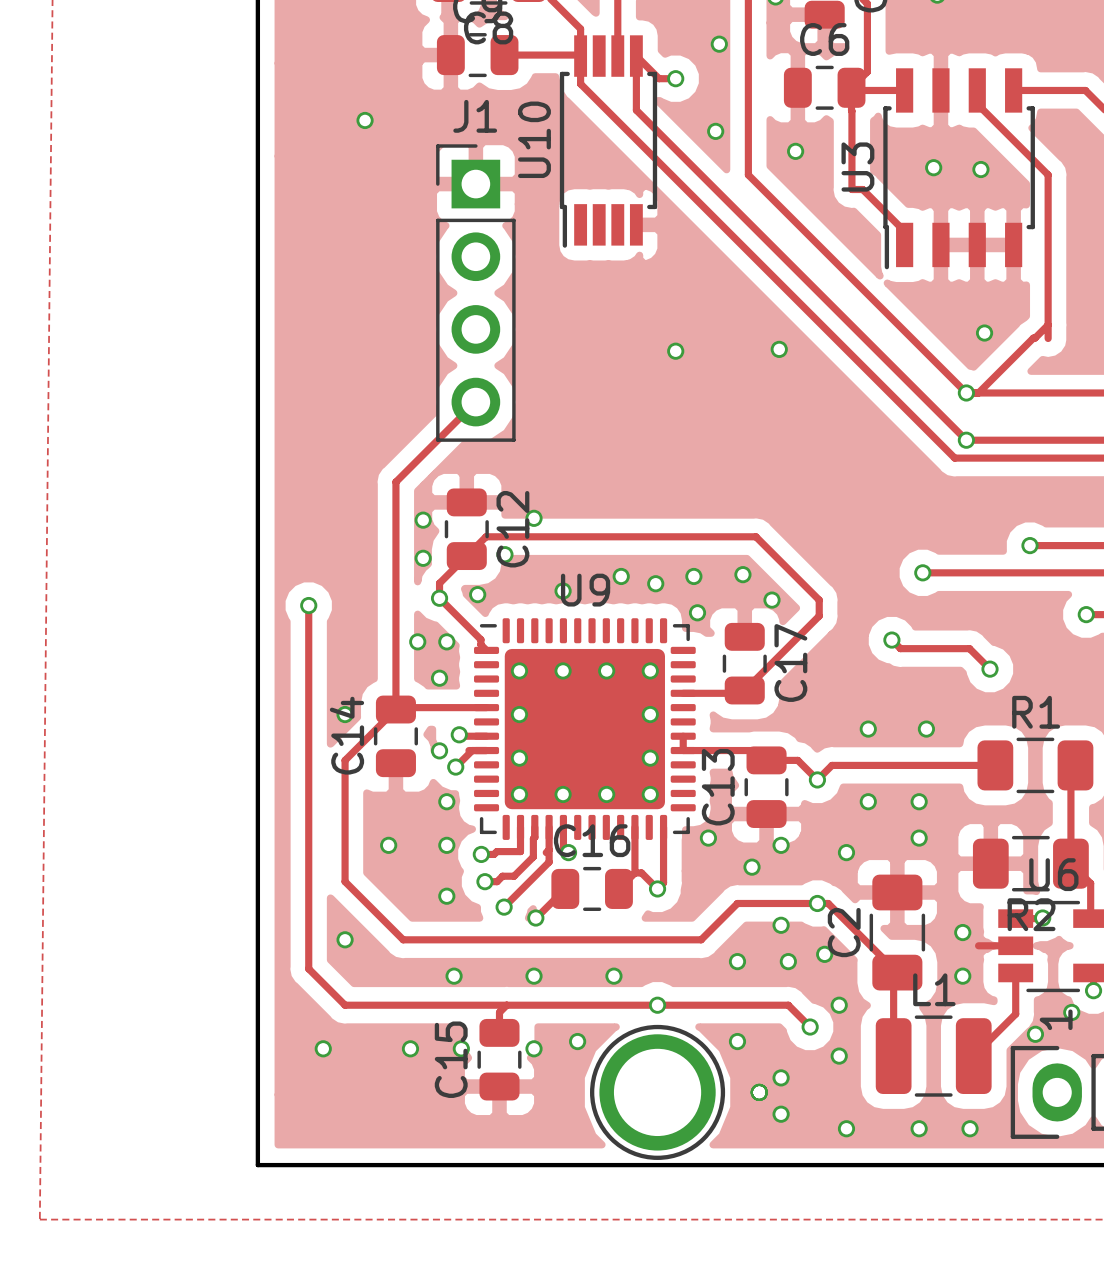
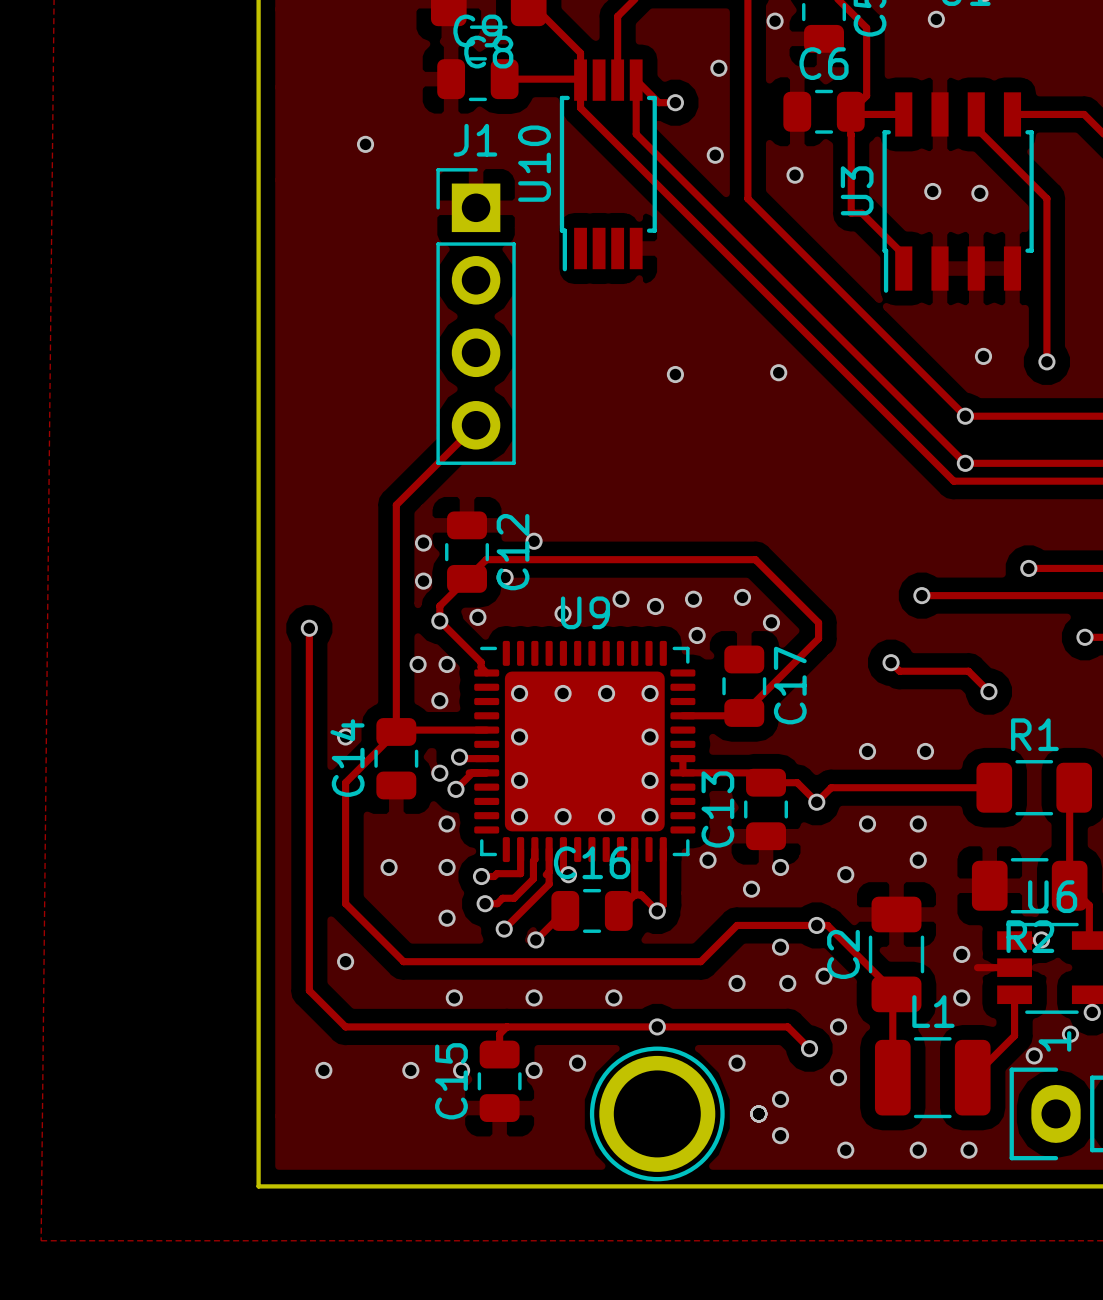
track: (1048, 325) (978, 392) -> none
via: none -> (1046, 361)

